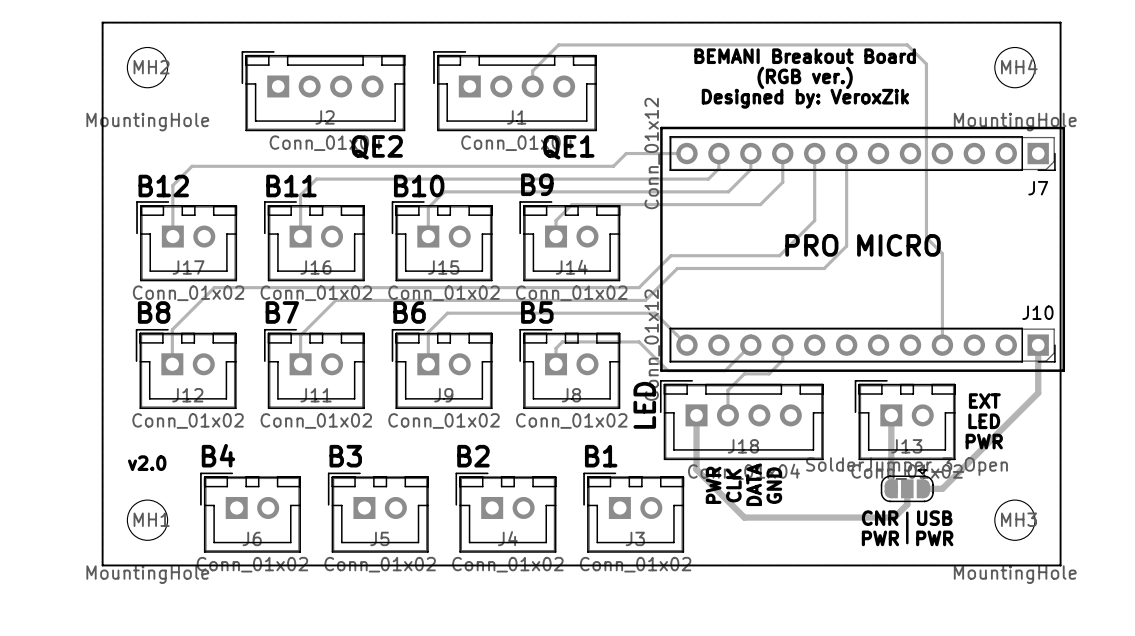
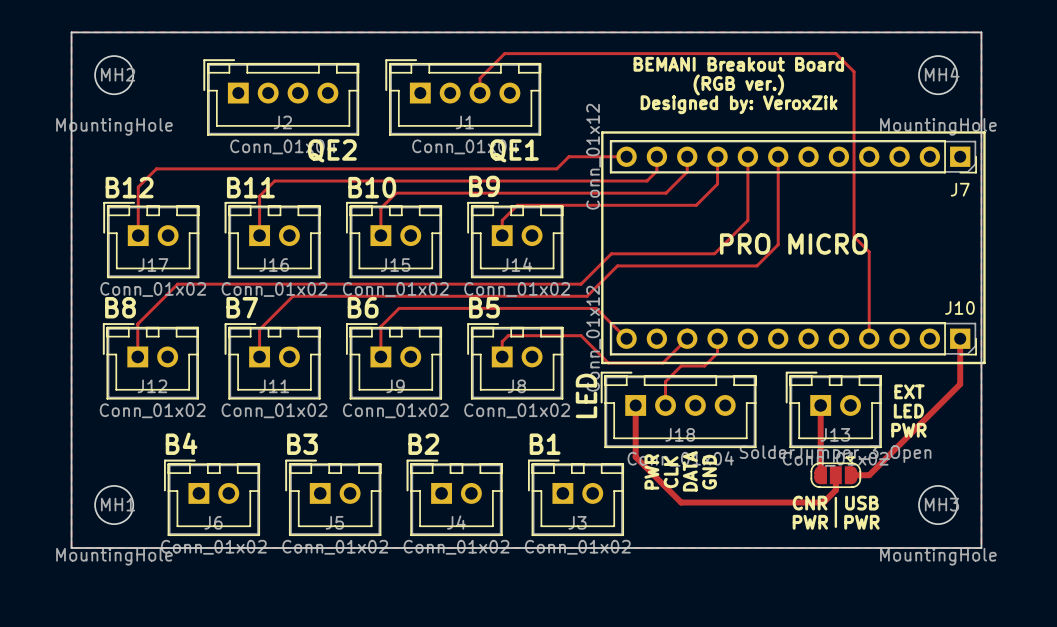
text: v2.0 (147, 463) -> none

